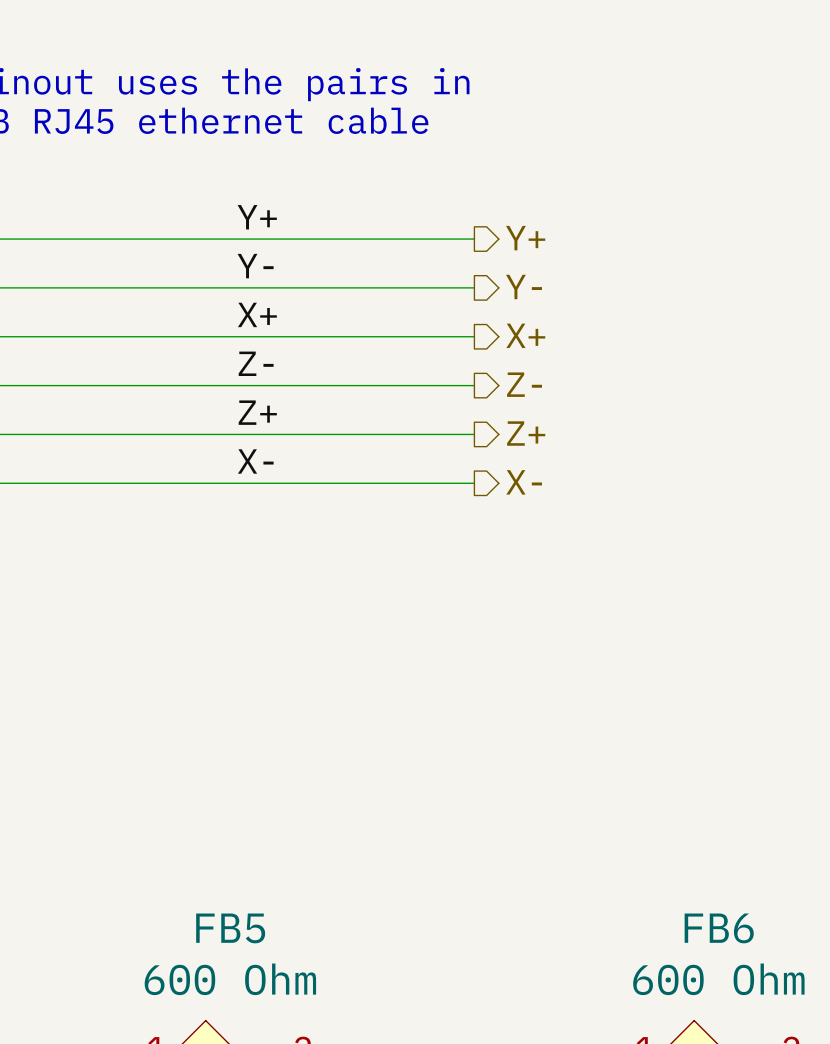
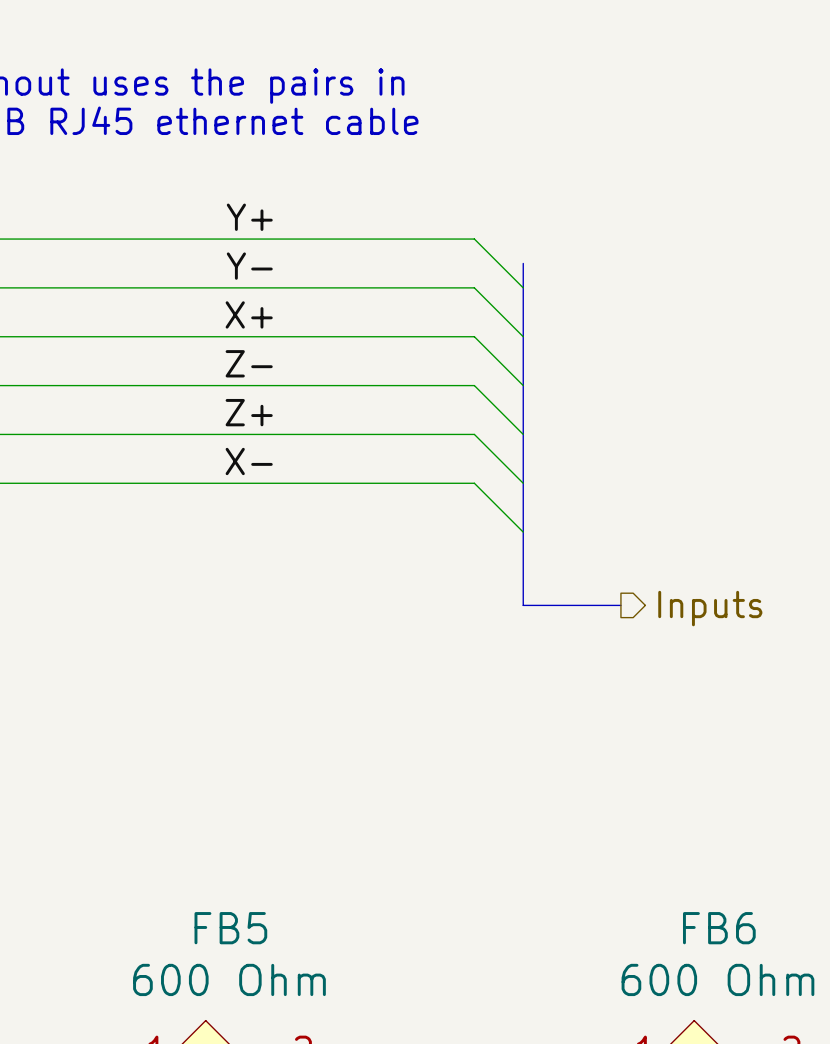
hierarchical label: Y+ (525, 238) -> none
wire: none -> (474, 239) (523, 287)
bus: none -> (523, 263) (523, 605) (620, 605)
hierarchical label: Y- (524, 286) -> none
wire: none -> (474, 287) (523, 336)
hierarchical label: X+ (525, 335) -> none
wire: none -> (474, 336) (523, 385)
hierarchical label: Z- (524, 384) -> none
wire: none -> (474, 385) (523, 434)
hierarchical label: Z+ (526, 433) -> none
wire: none -> (474, 434) (523, 483)
hierarchical label: X- (524, 482) -> none
wire: none -> (474, 483) (523, 532)
hierarchical label: none -> Inputs (710, 608)

